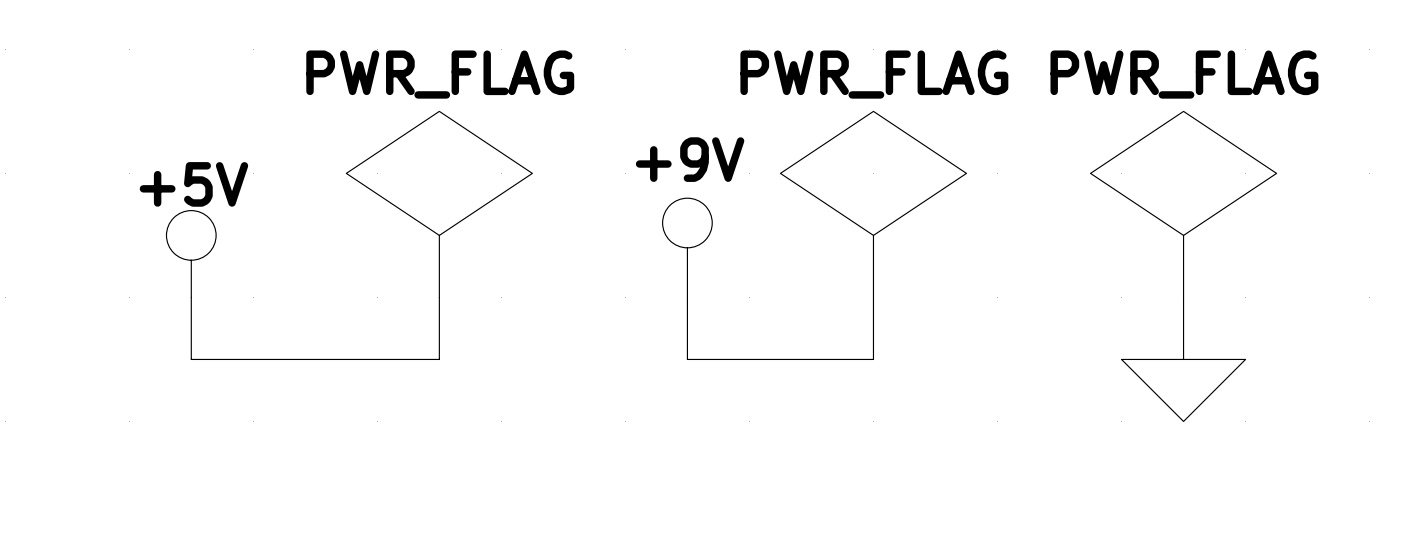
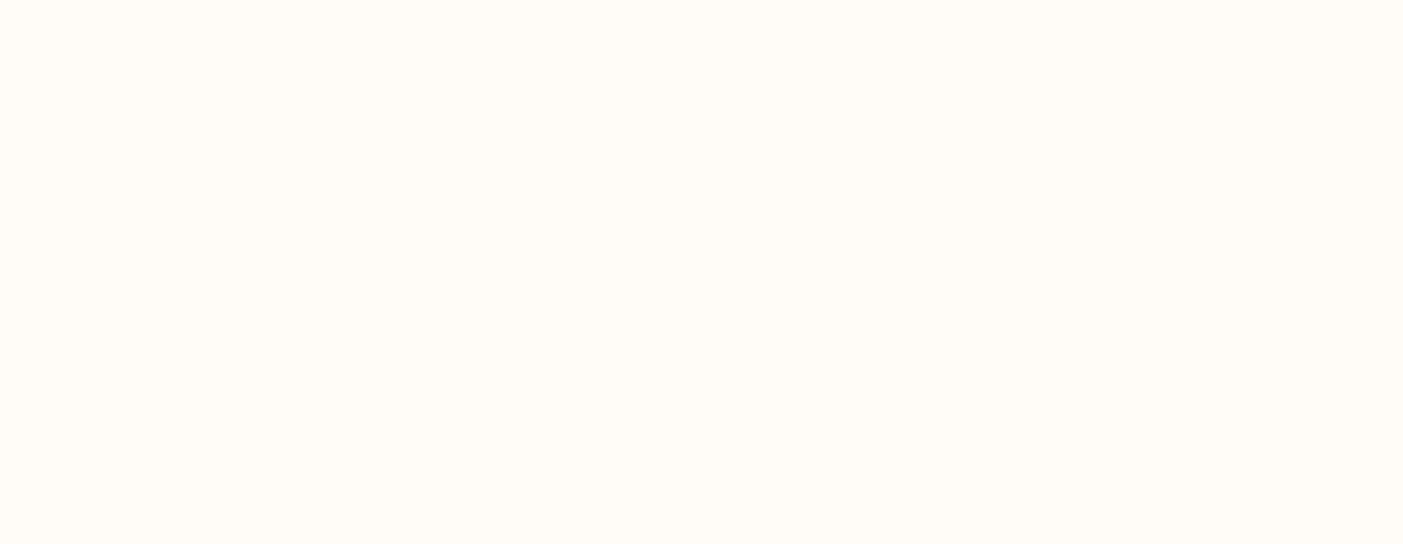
power symbol: PWR_FLAG (439, 204) -> none
power symbol: PWR_FLAG (873, 204) -> none
power symbol: PWR_FLAG (1183, 204) -> none
power symbol: +9V (687, 247) -> none
power symbol: +5V (191, 254) -> none
wire: (191, 297) (191, 359) (439, 359) (439, 297) -> none
wire: (687, 297) (687, 359) (873, 359) (873, 297) -> none
wire: (1183, 297) (1183, 359) -> none
power symbol: (1183, 390) -> none

